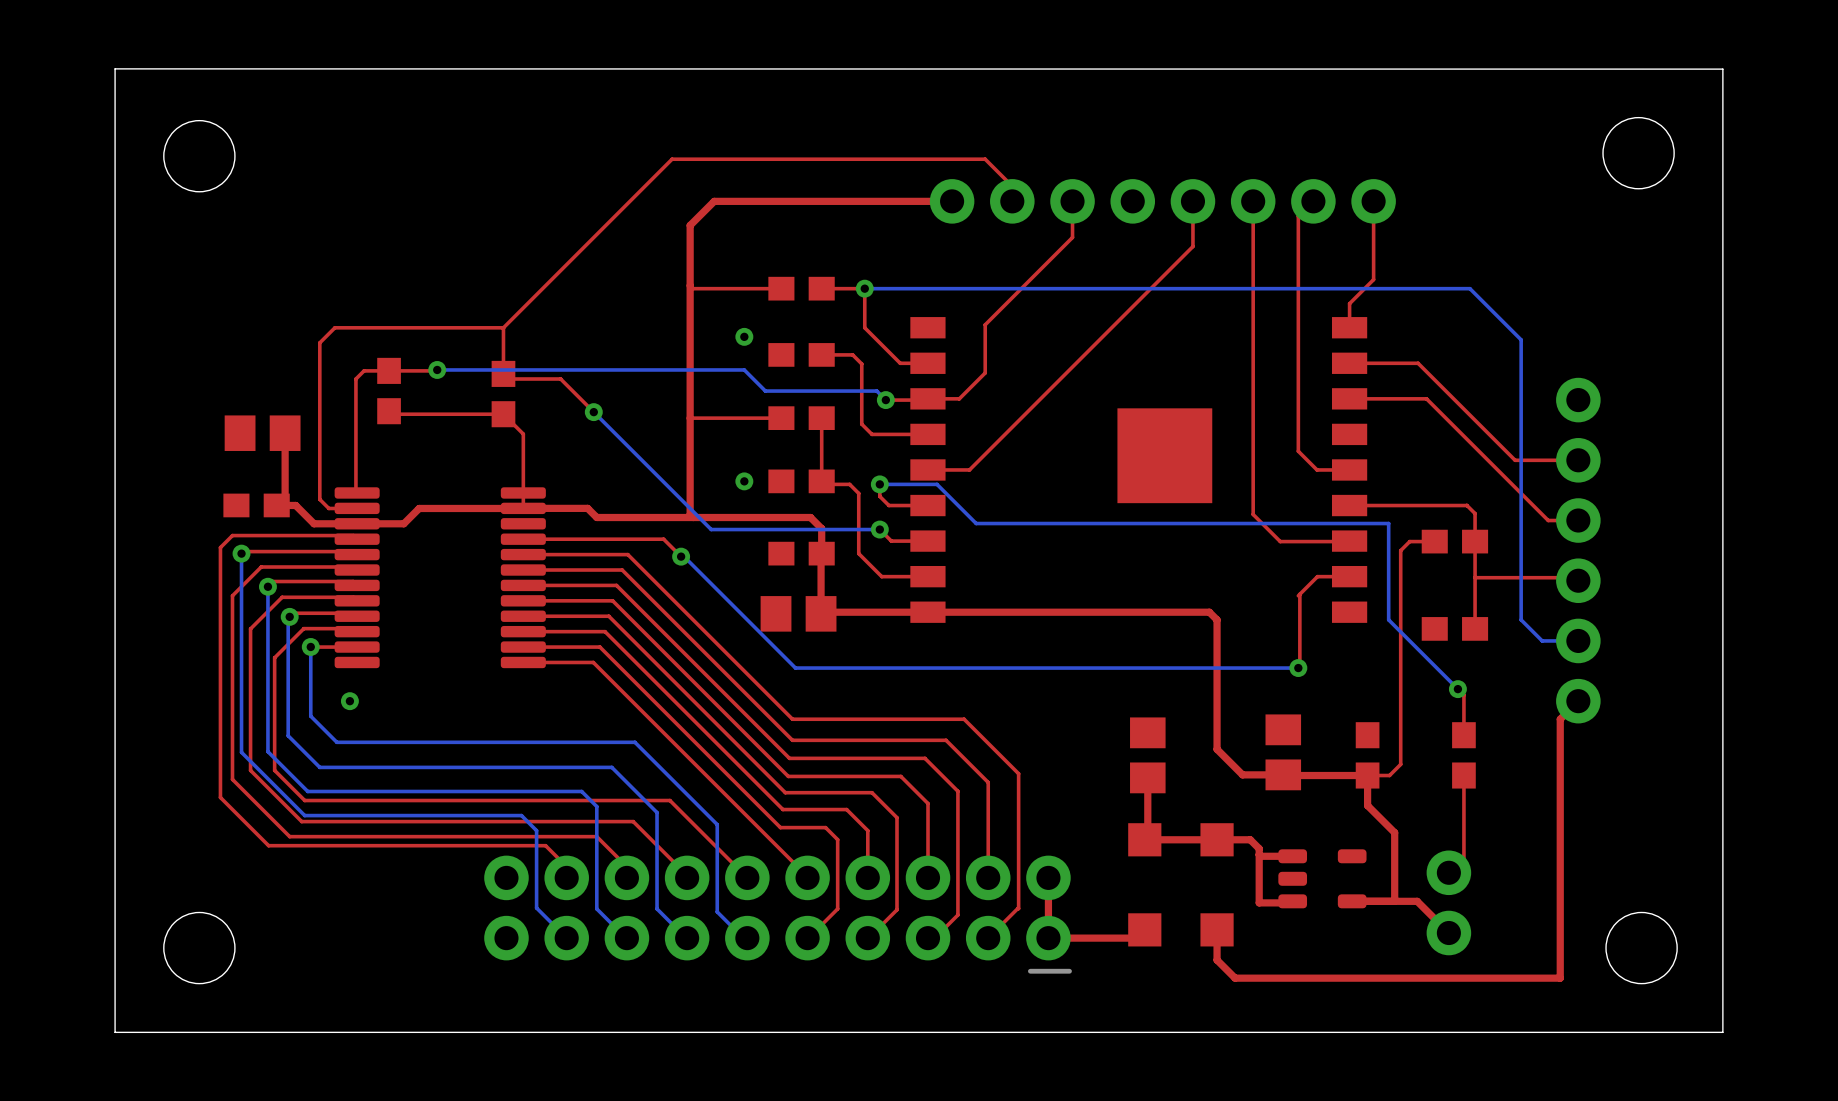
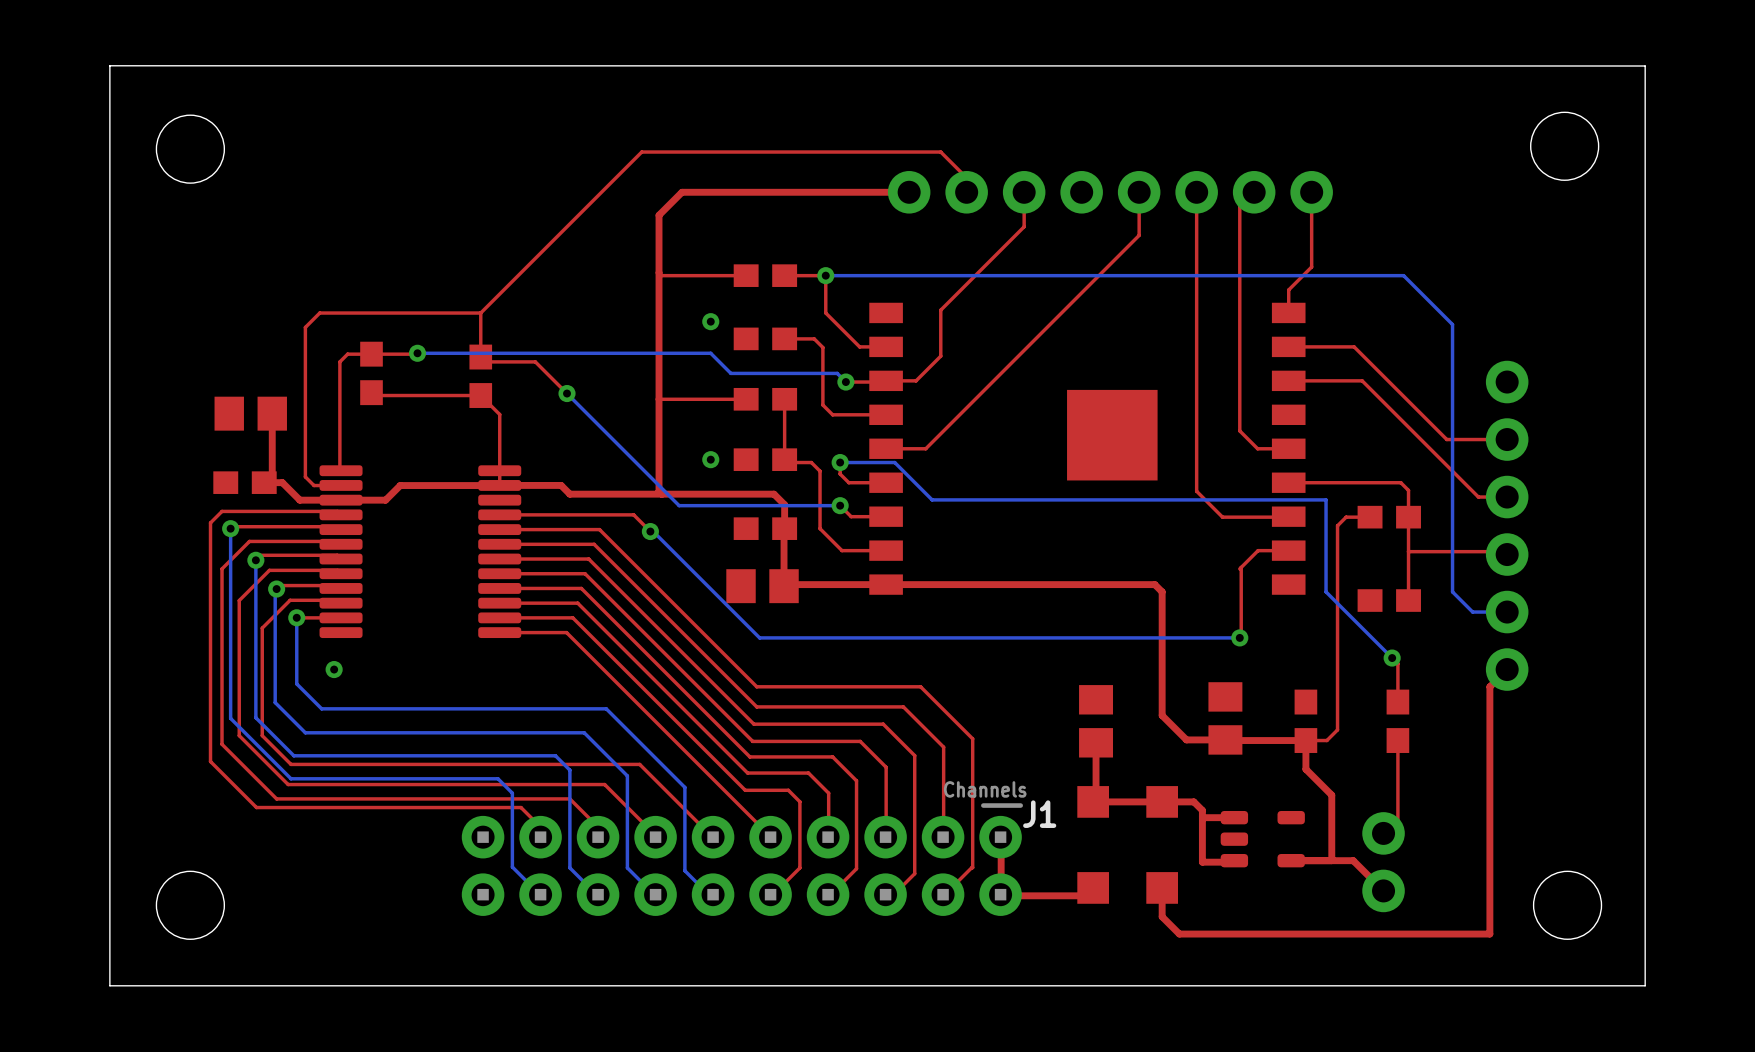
J1 side: top (778, 914) -> bottom (742, 859)

